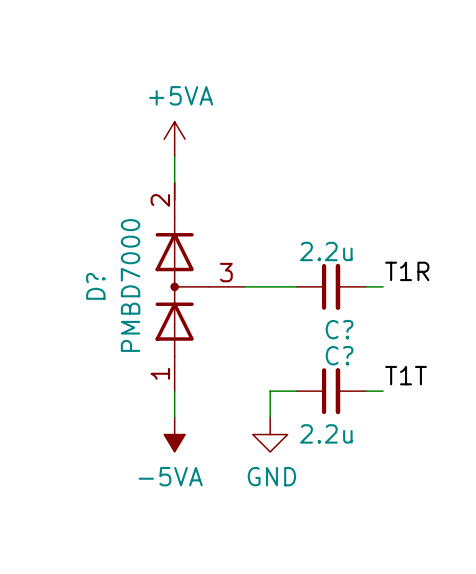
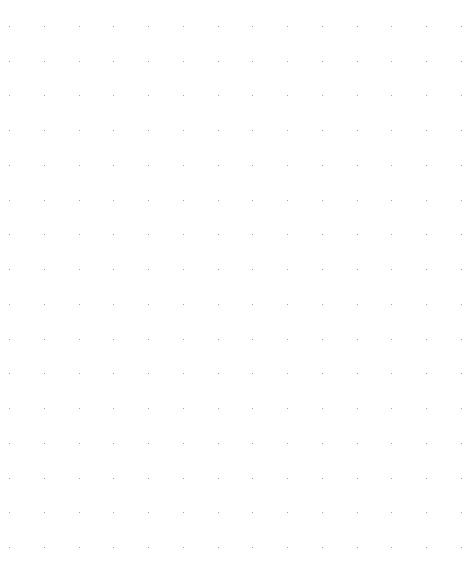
power symbol: +5VA (174, 139) -> none
wire: (174, 156) (174, 182) -> none
label: T1R (407, 271) -> none
D?: PMBD7000 (199, 286) -> none
wire: (244, 286) (296, 286) -> none
C?: 2.2u (331, 286) -> none
wire: (365, 286) (383, 286) -> none
label: T1T (406, 375) -> none
wire: (174, 391) (174, 417) -> none
wire: (296, 391) (270, 391) (270, 417) -> none
C?: 2.2u (331, 391) -> none
wire: (365, 391) (383, 391) -> none
power symbol: -5VA (174, 434) -> none
power symbol: GND (270, 434) -> none

